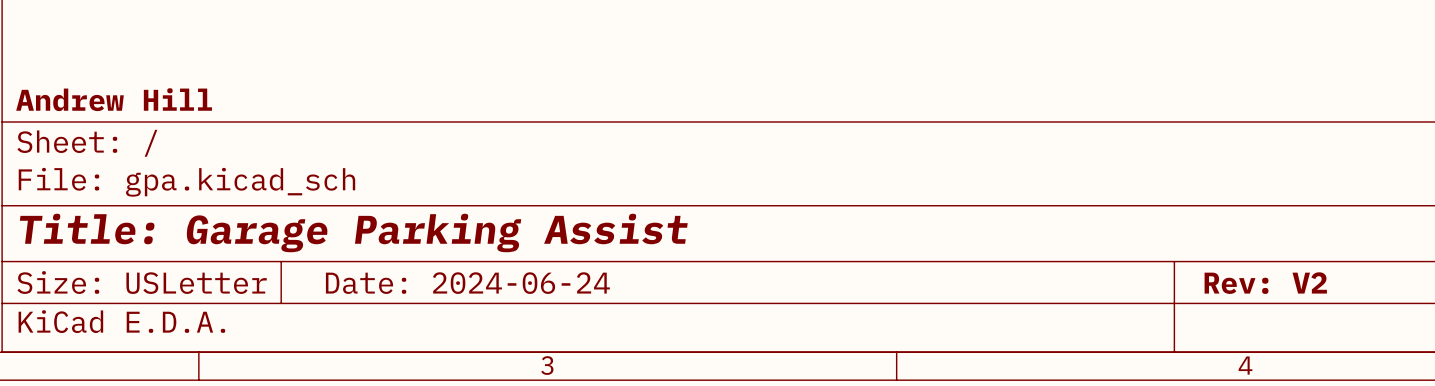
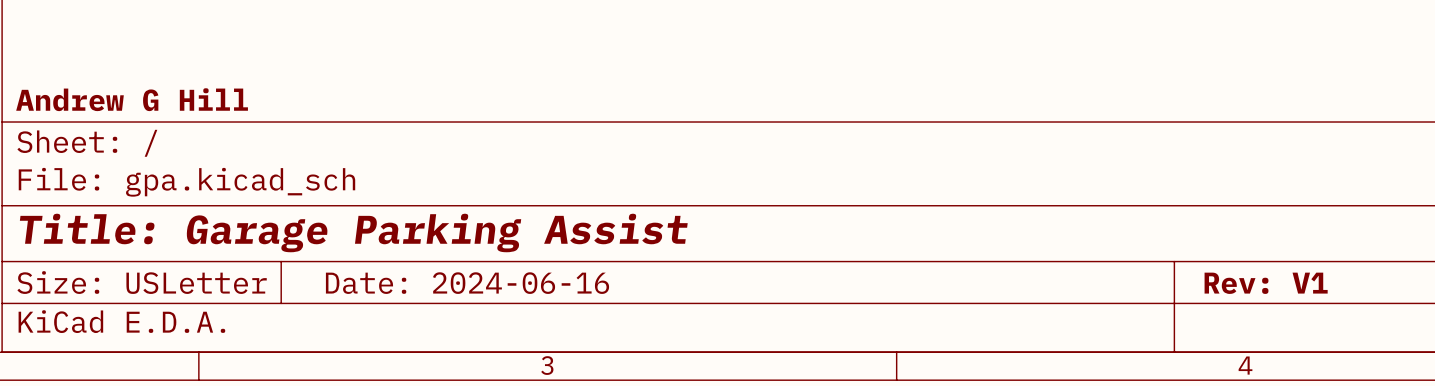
title block: Andrew Hill (114, 99) -> Andrew G Hill (132, 99)
title block: Date: 2024-06-24 (467, 283) -> Date: 2024-06-16 (467, 283)
title block: Rev: V2 (1265, 283) -> Rev: V1 (1266, 283)

